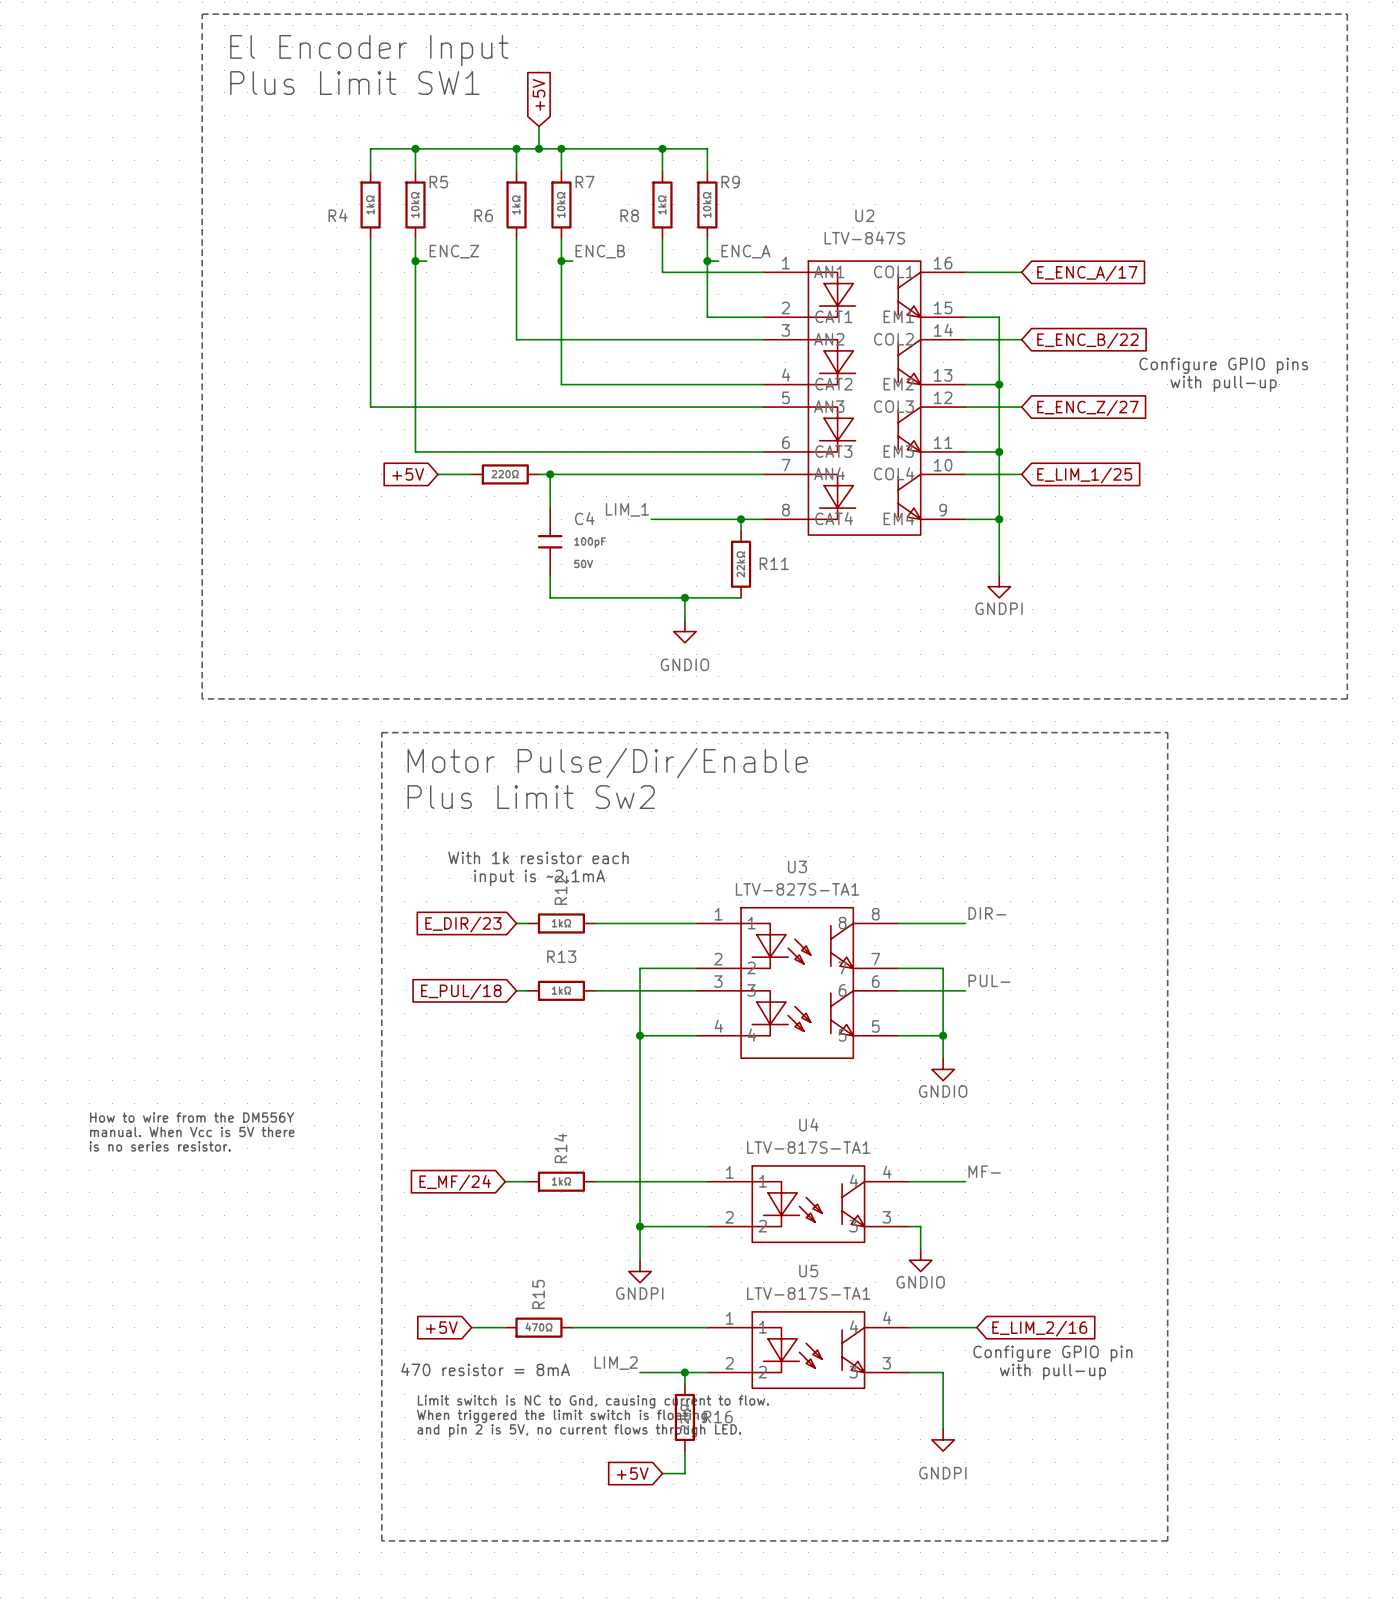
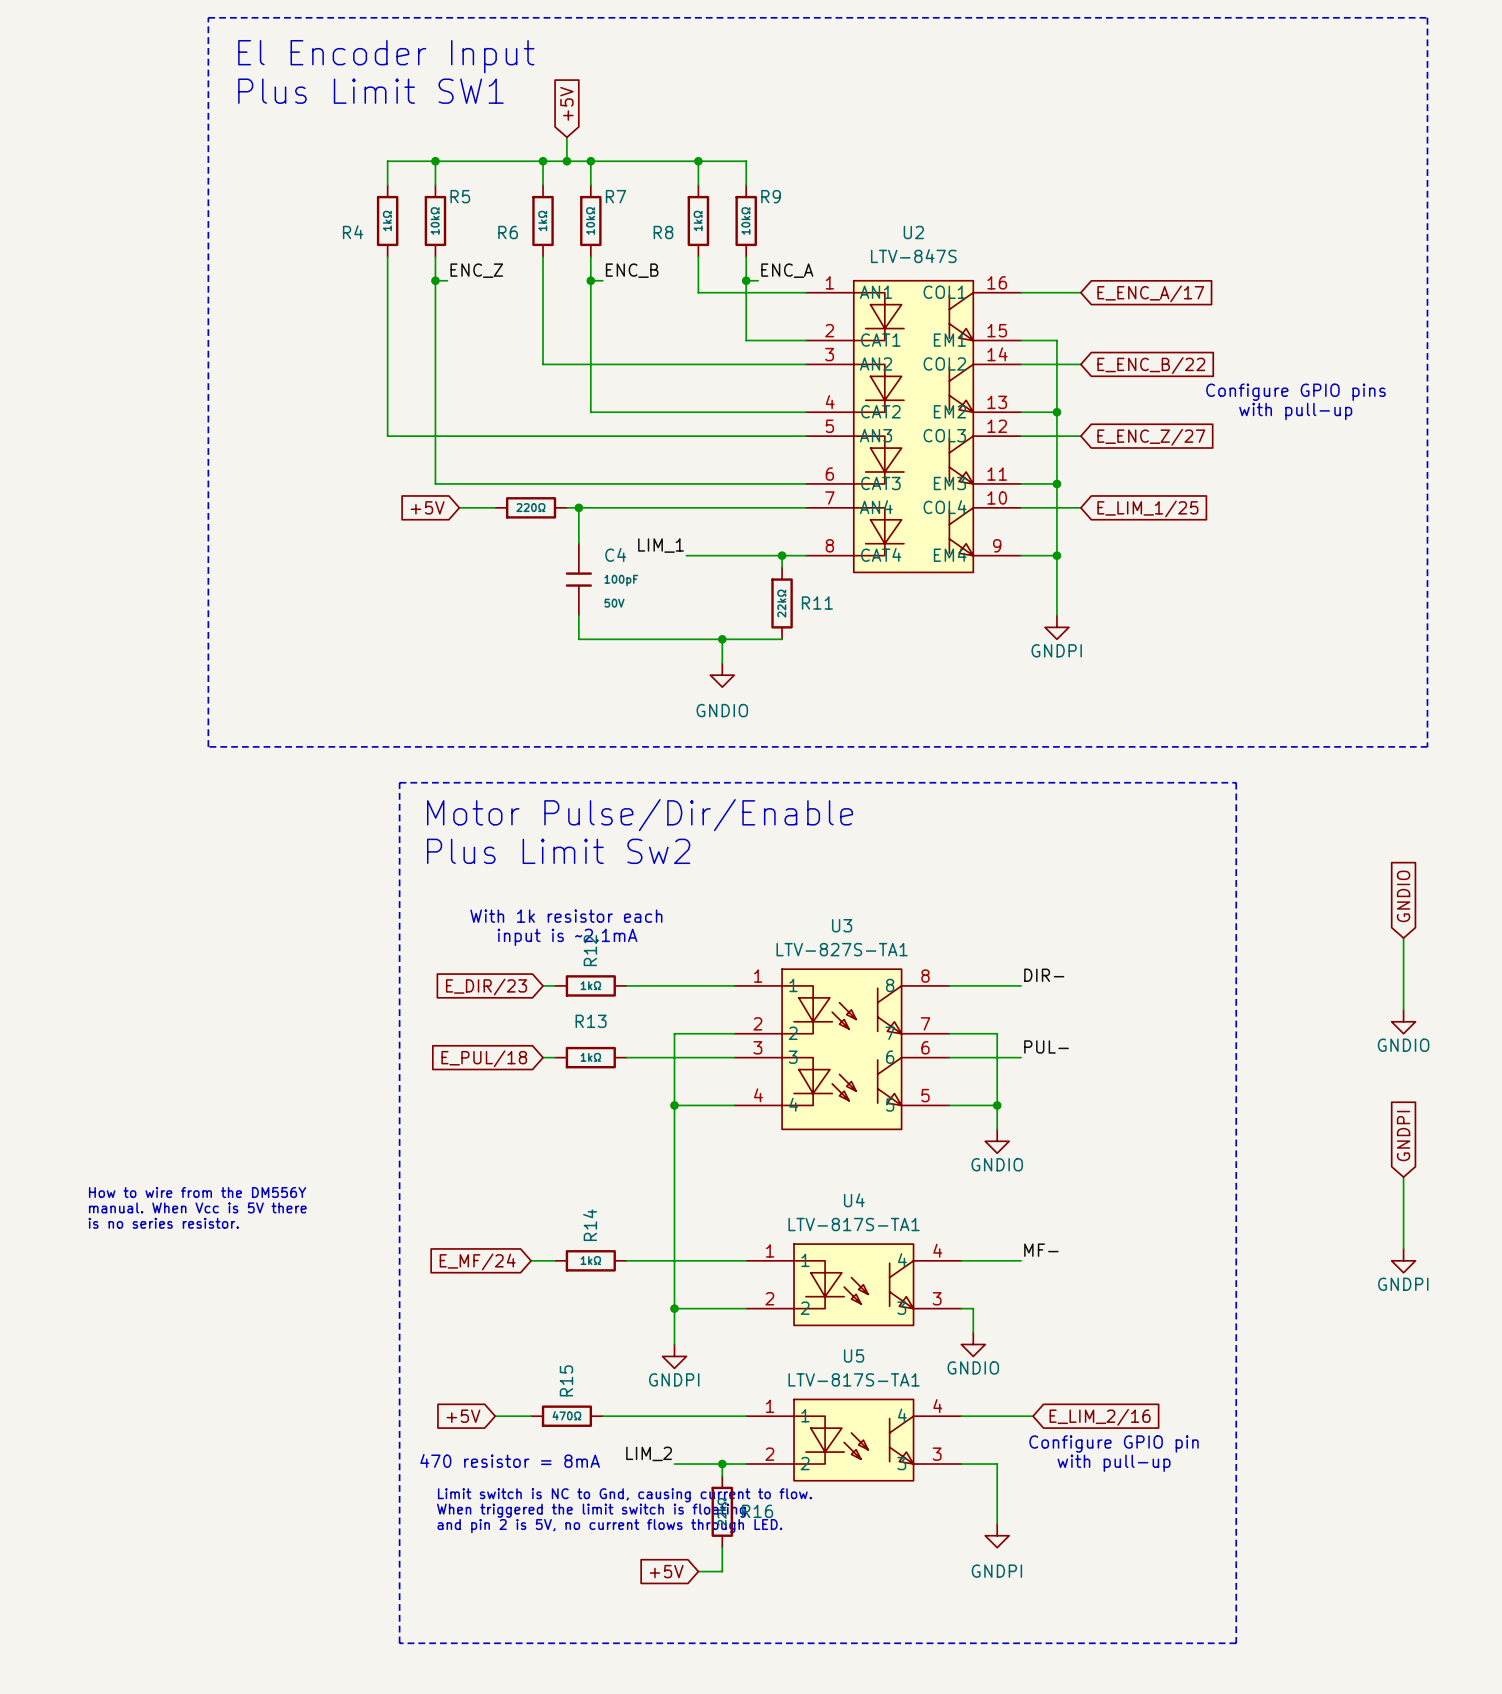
global label: none -> GNDIO (1403, 896)
wire: none -> (1403, 938) (1403, 1009)
power symbol: none -> GNDIO (1403, 1021)
global label: none -> GNDPI (1403, 1136)
wire: none -> (1403, 1177) (1403, 1248)
power symbol: none -> GNDPI (1403, 1260)

